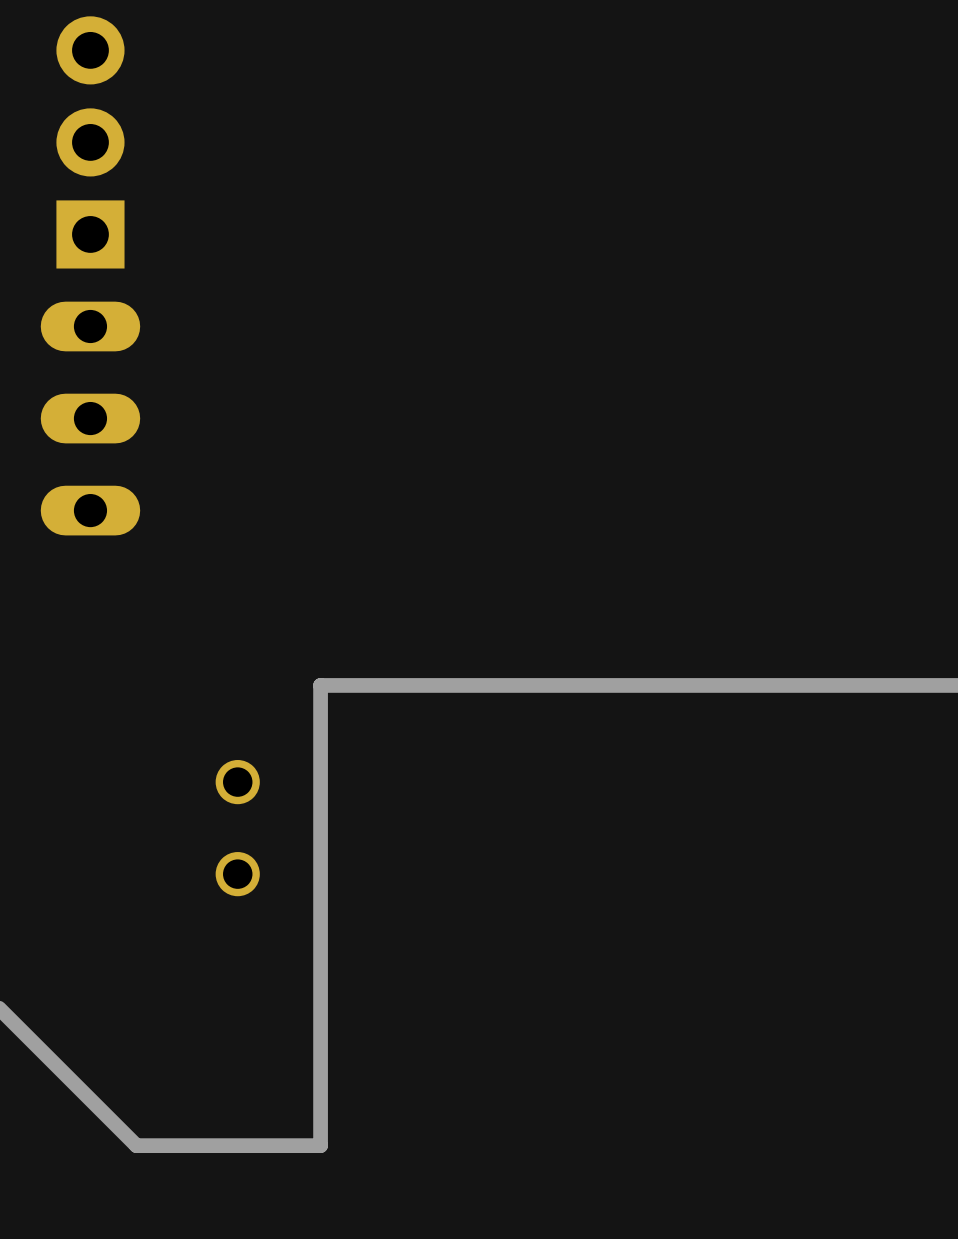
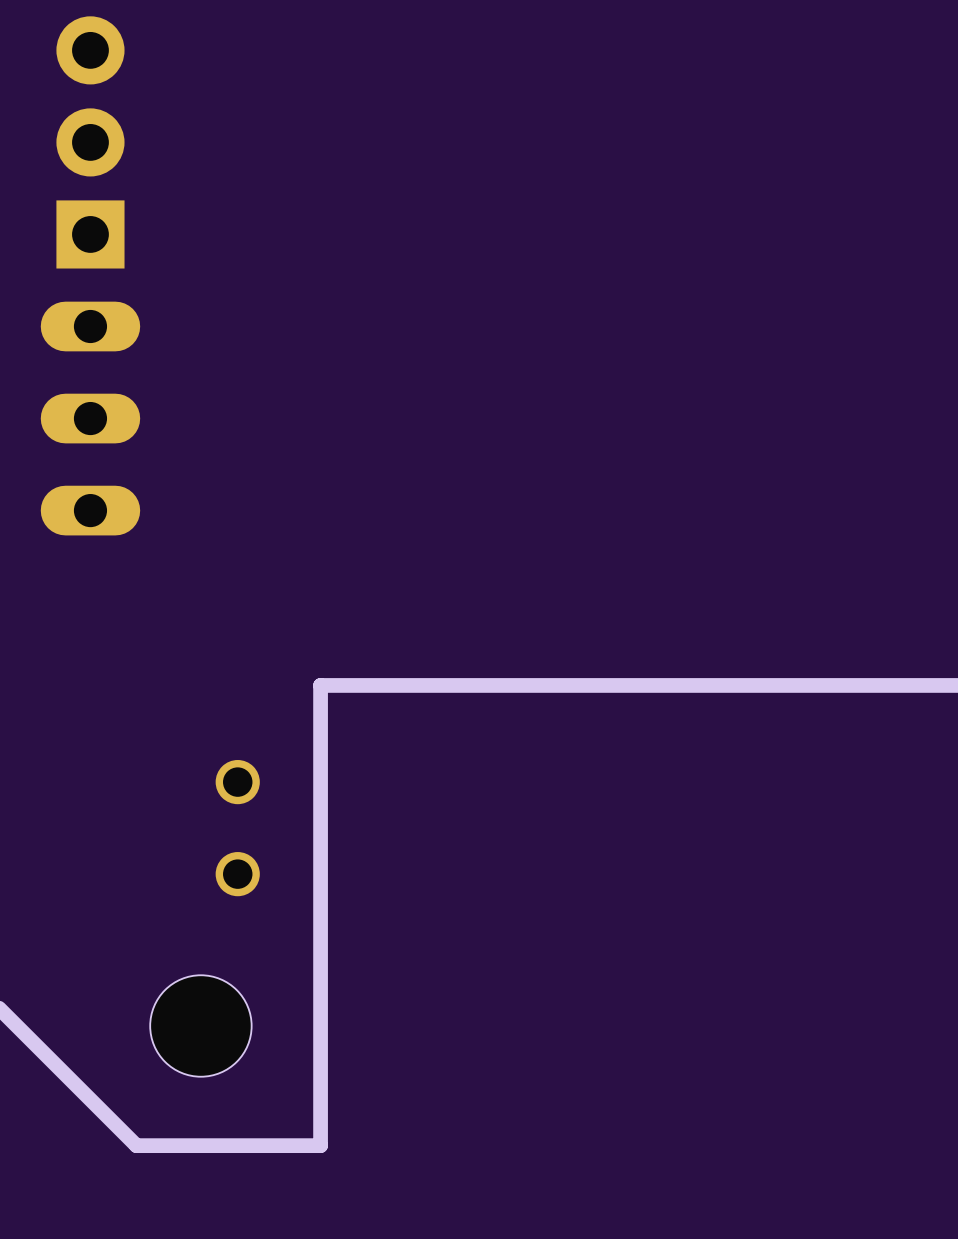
hole: none -> (200, 1025)

